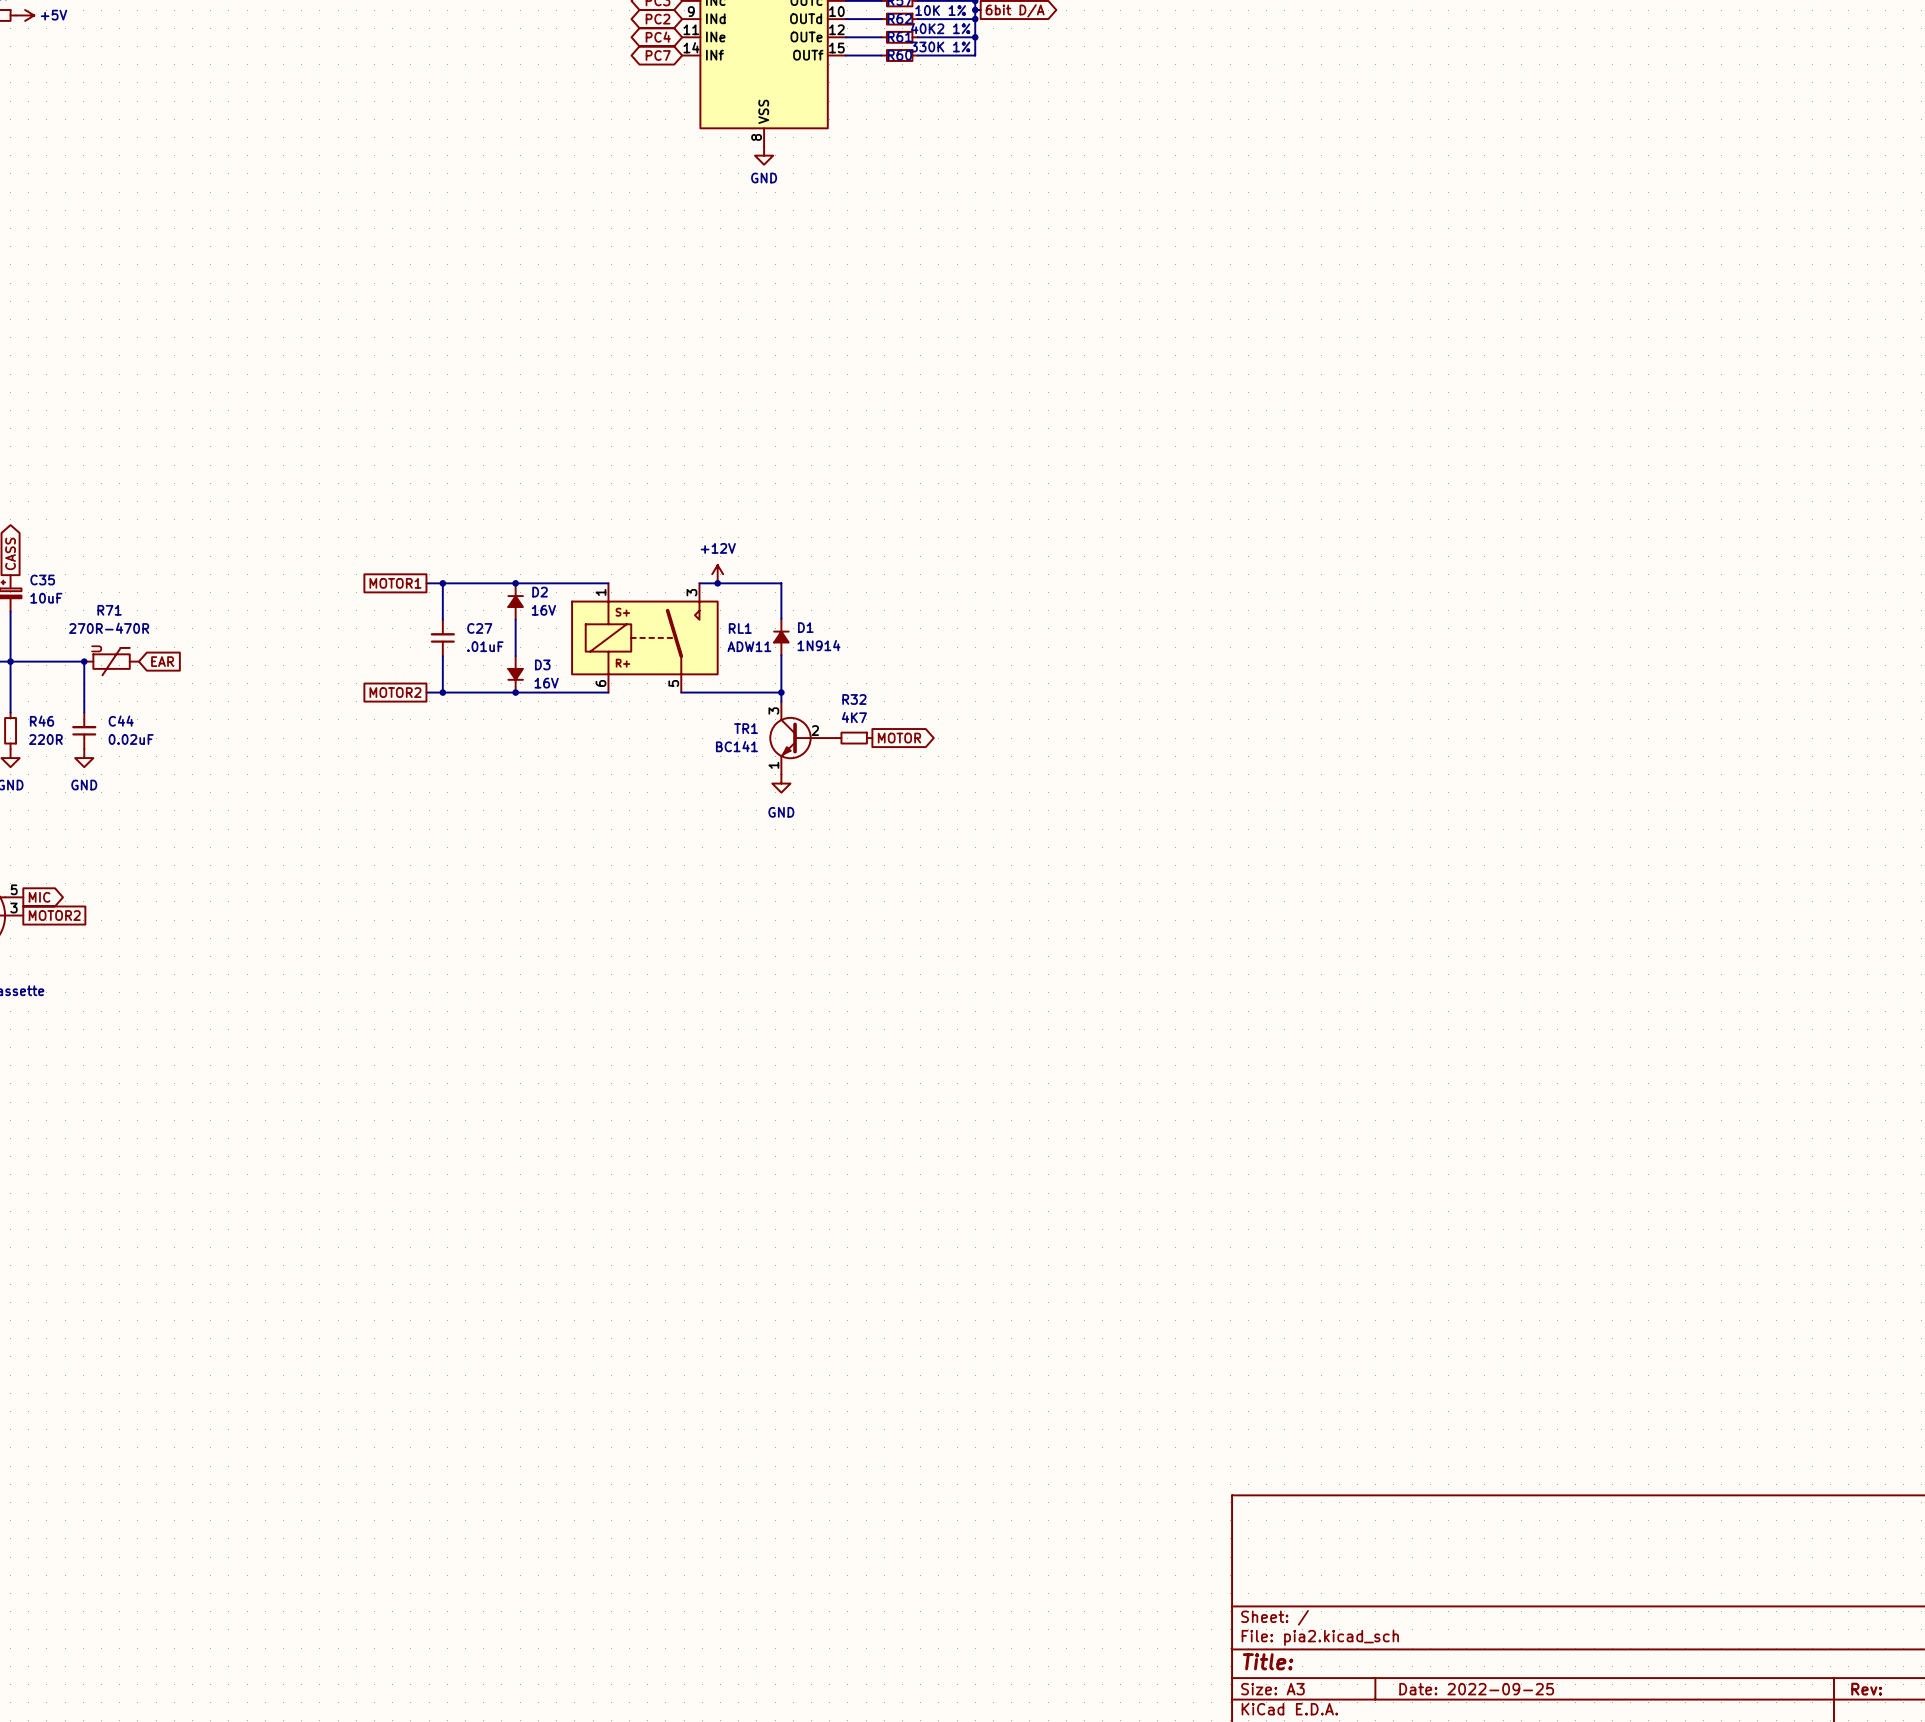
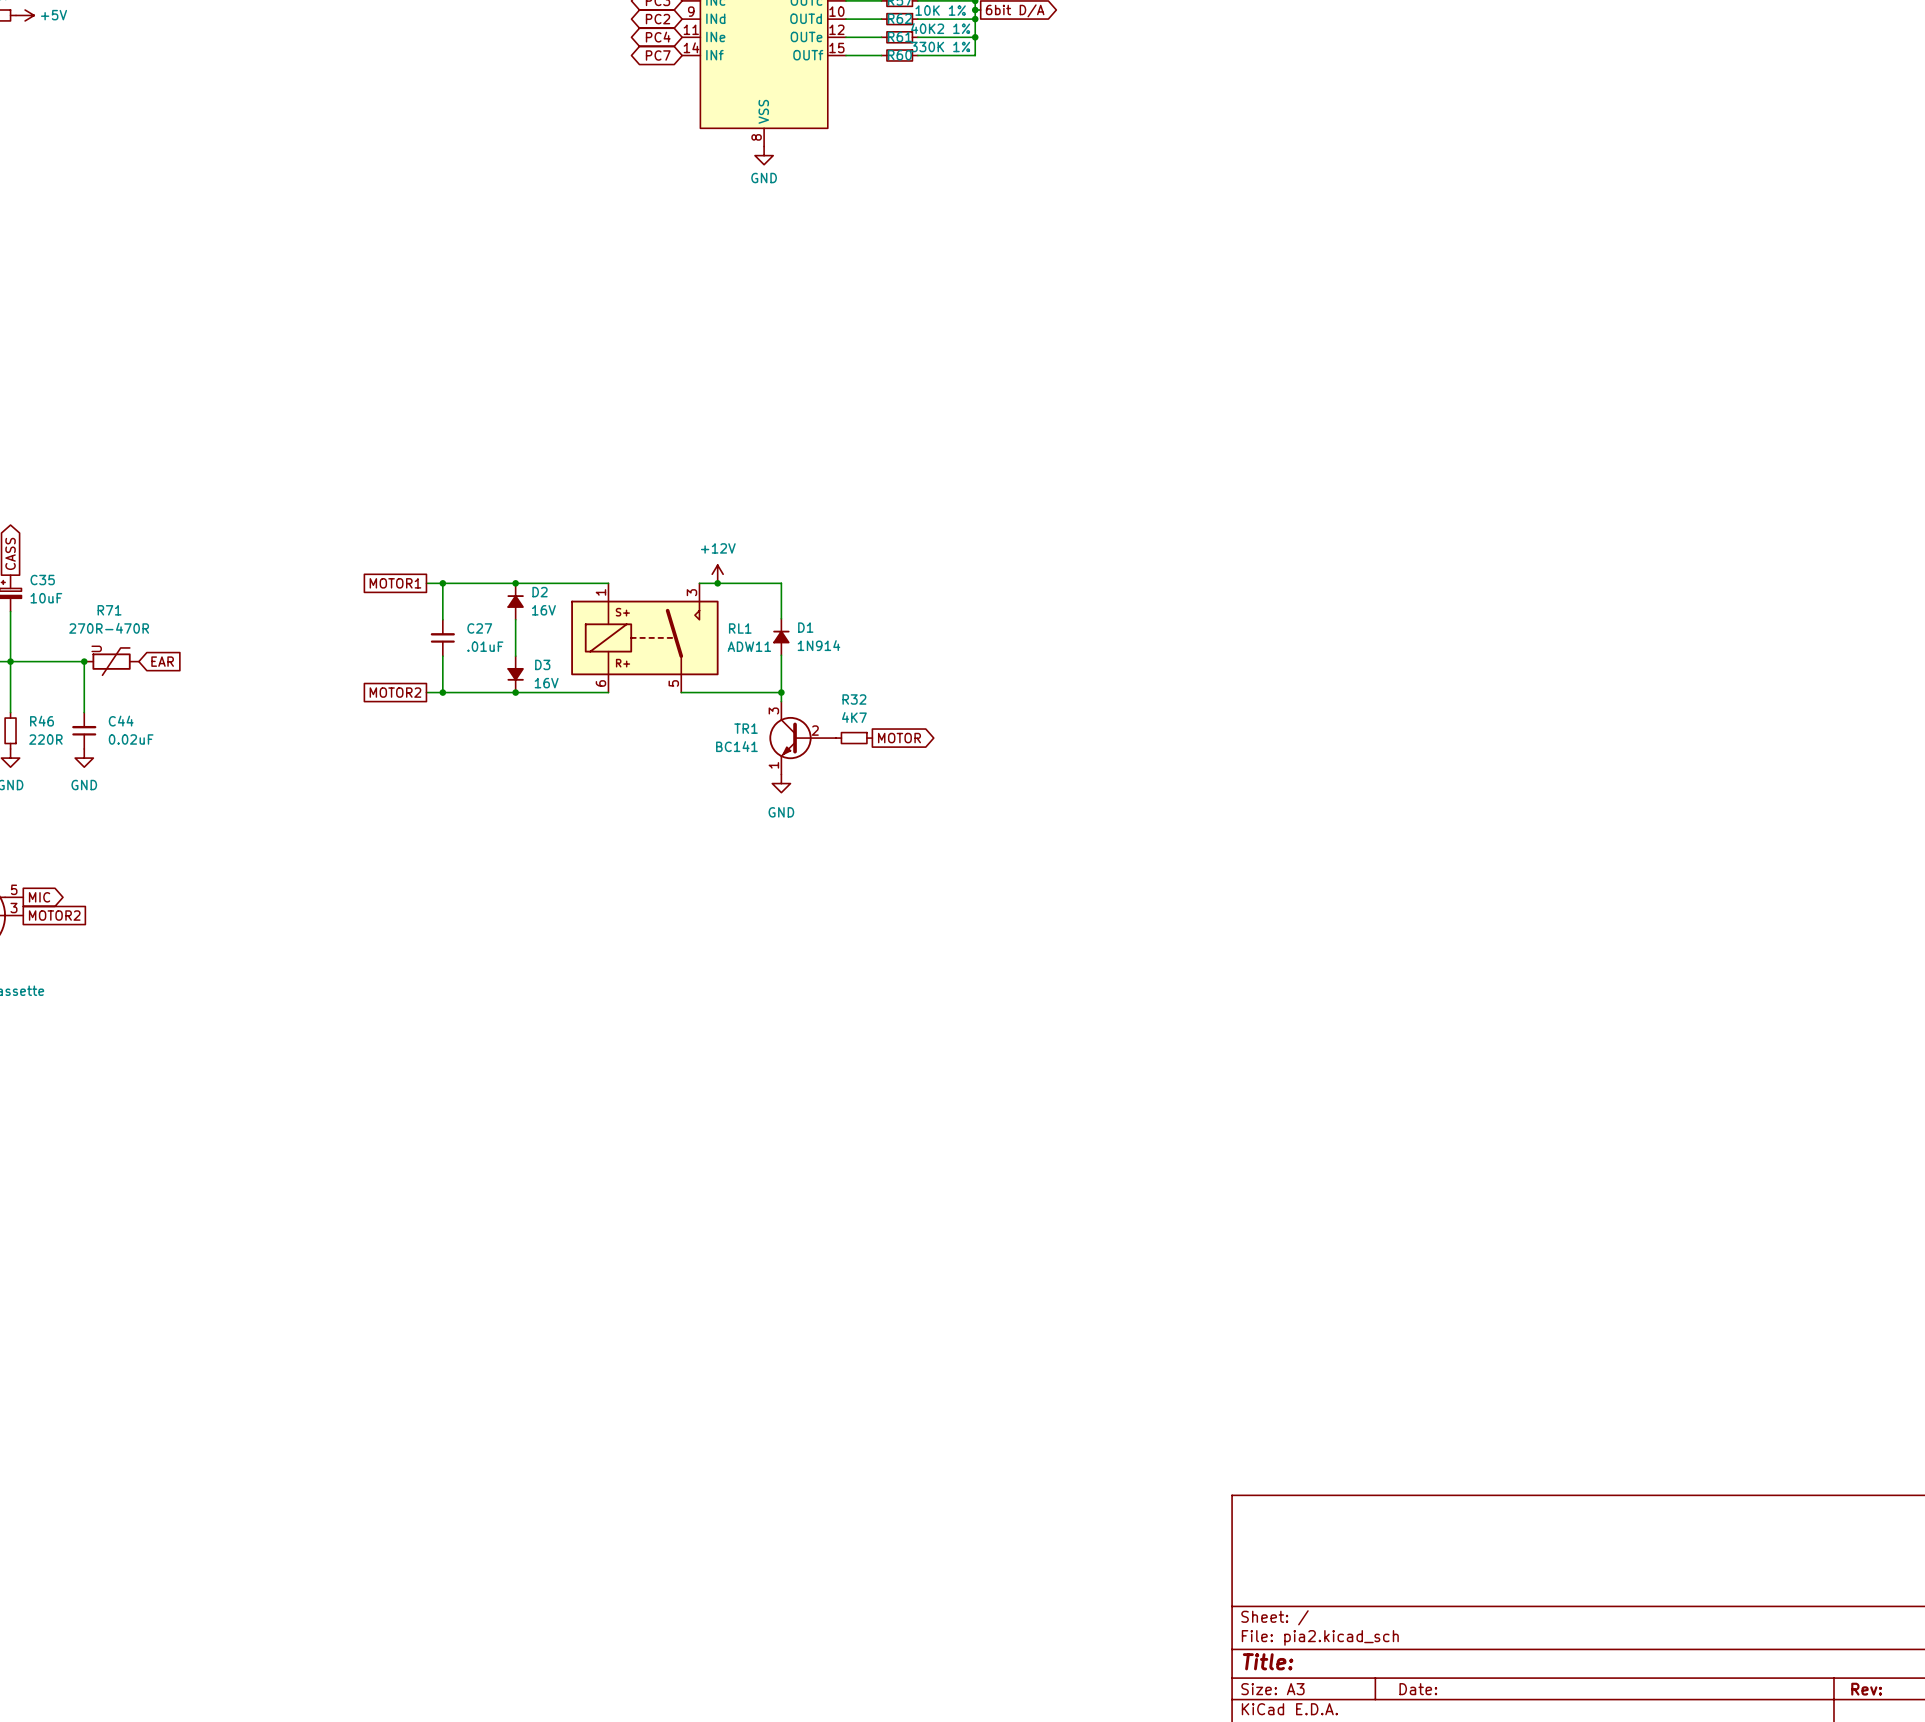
title block: Date: 2022-09-25 (1476, 1689) -> Date: (1418, 1689)

